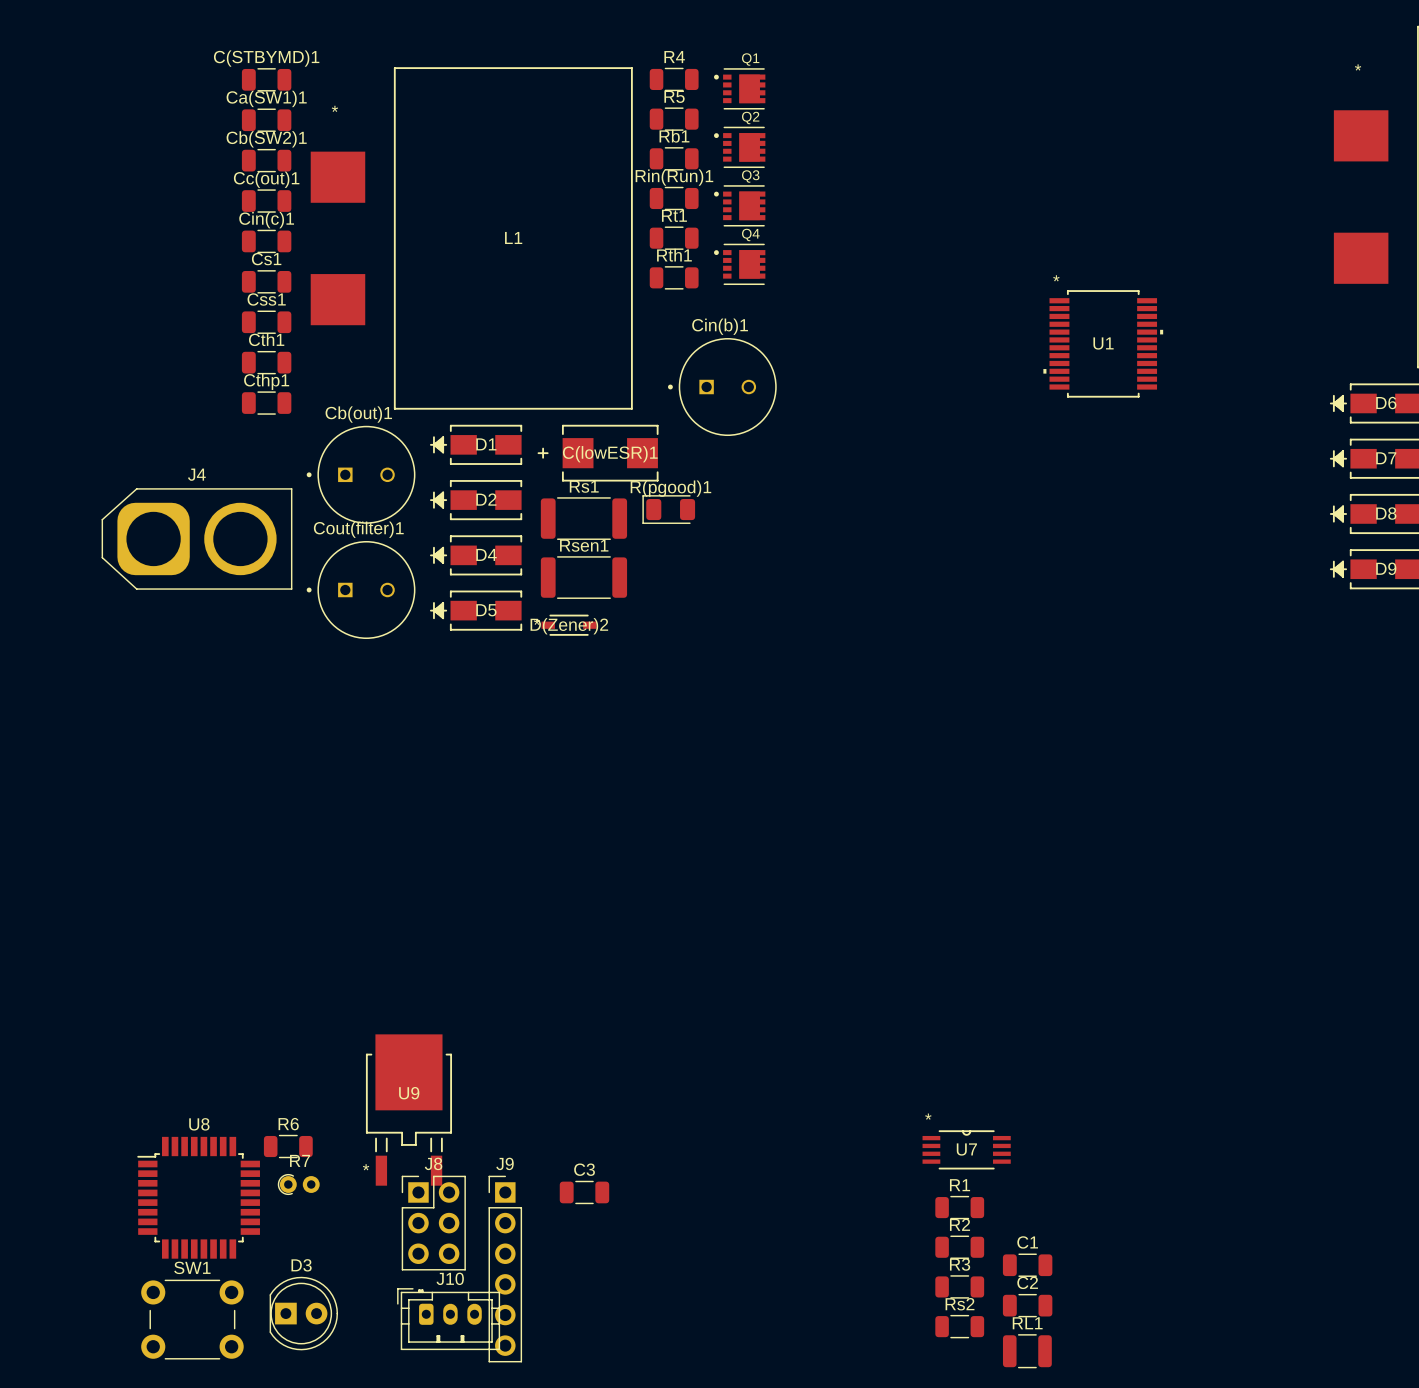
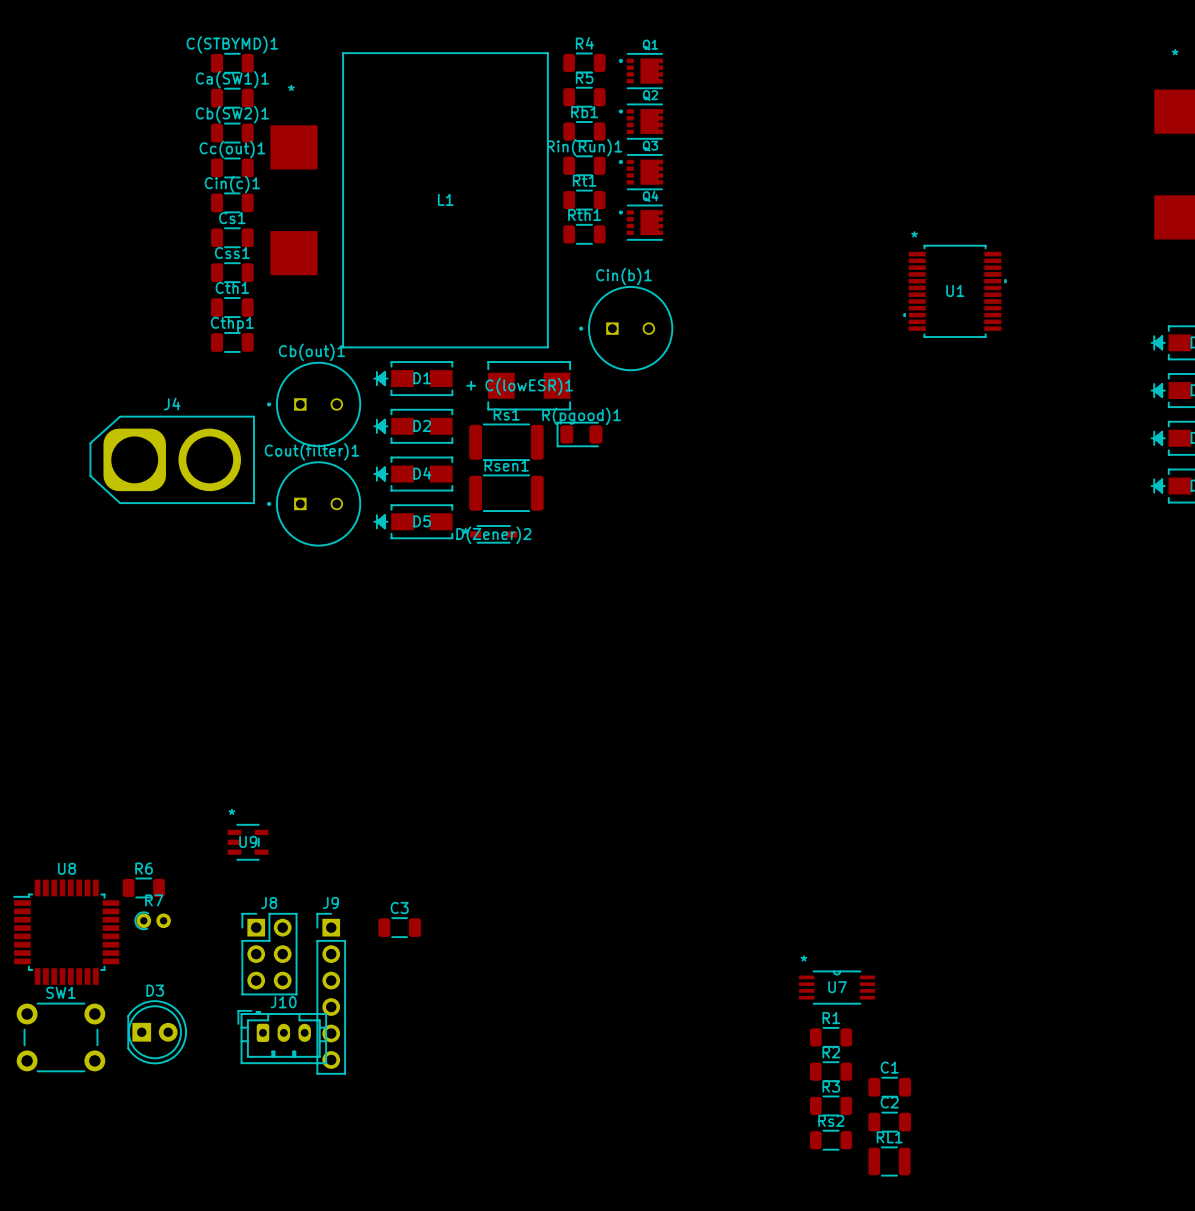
U9 footprint: [365, 1034, 453, 1186] -> [227, 824, 269, 861]
R6 position: (288, 1146) -> (143, 887)
R7 position: (298, 1184) -> (152, 920)
C3 position: (584, 1192) -> (399, 927)
U8 position: (198, 1197) -> (66, 932)
J8 position: (433, 1223) -> (269, 954)
J9 position: (505, 1269) -> (331, 993)
D3 position: (303, 1313) -> (157, 1032)
SW1 position: (192, 1319) -> (60, 1037)
J10 position: (448, 1319) -> (282, 1037)

